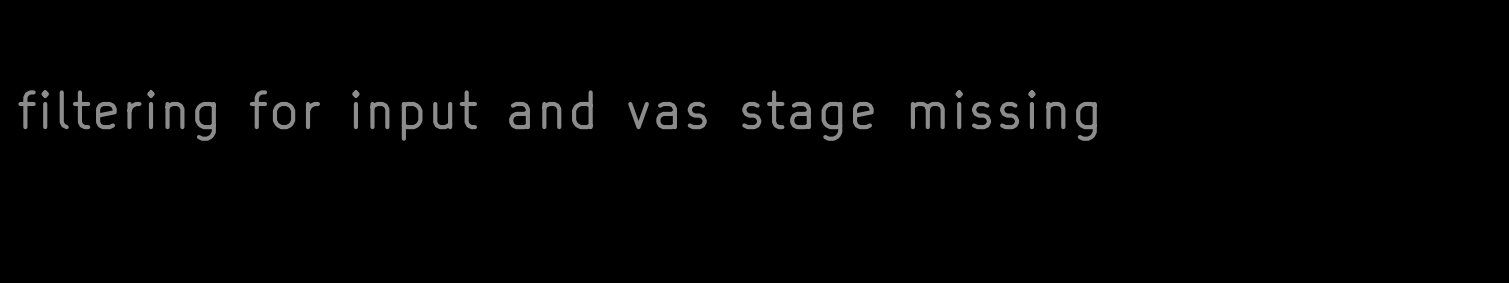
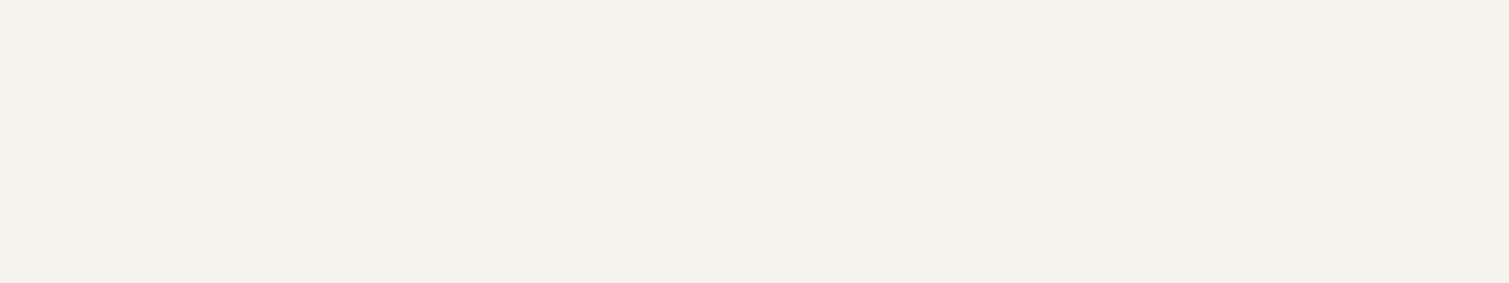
text: filtering for input and vas stage missing (557, 115) -> none

